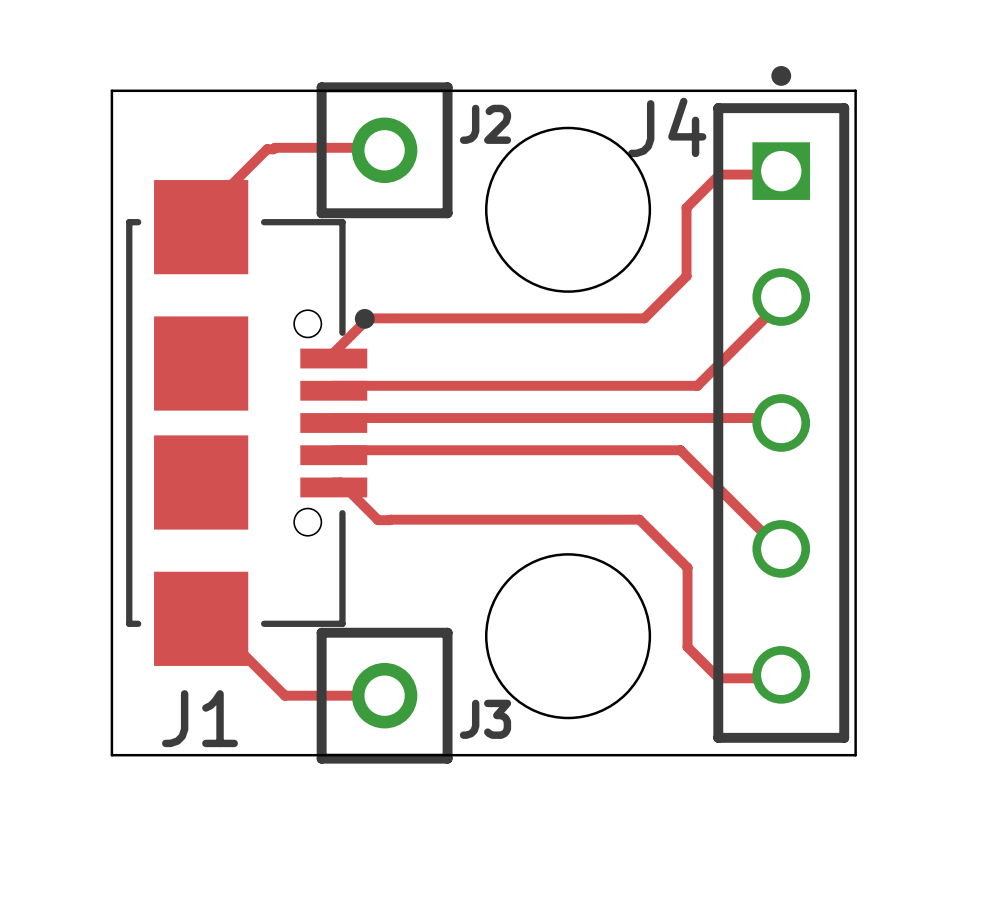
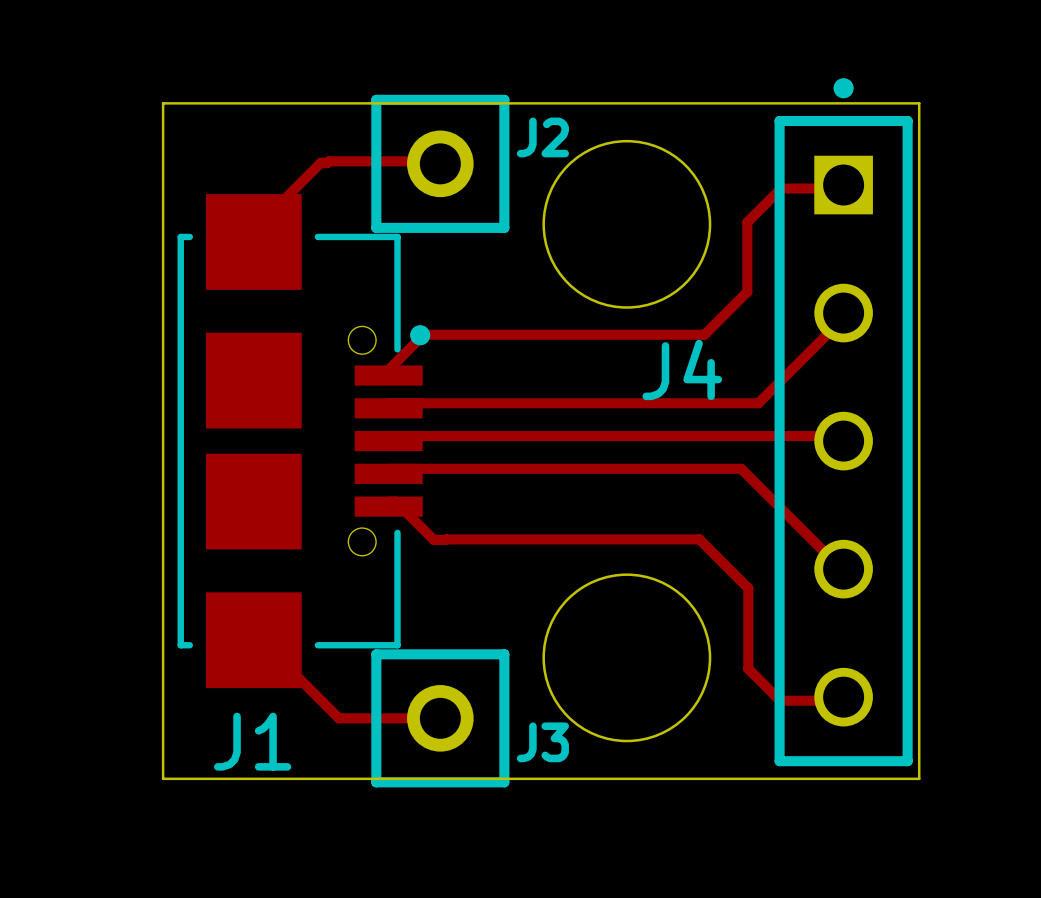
J4 name position: J4 (667, 127) -> J4 (682, 369)

